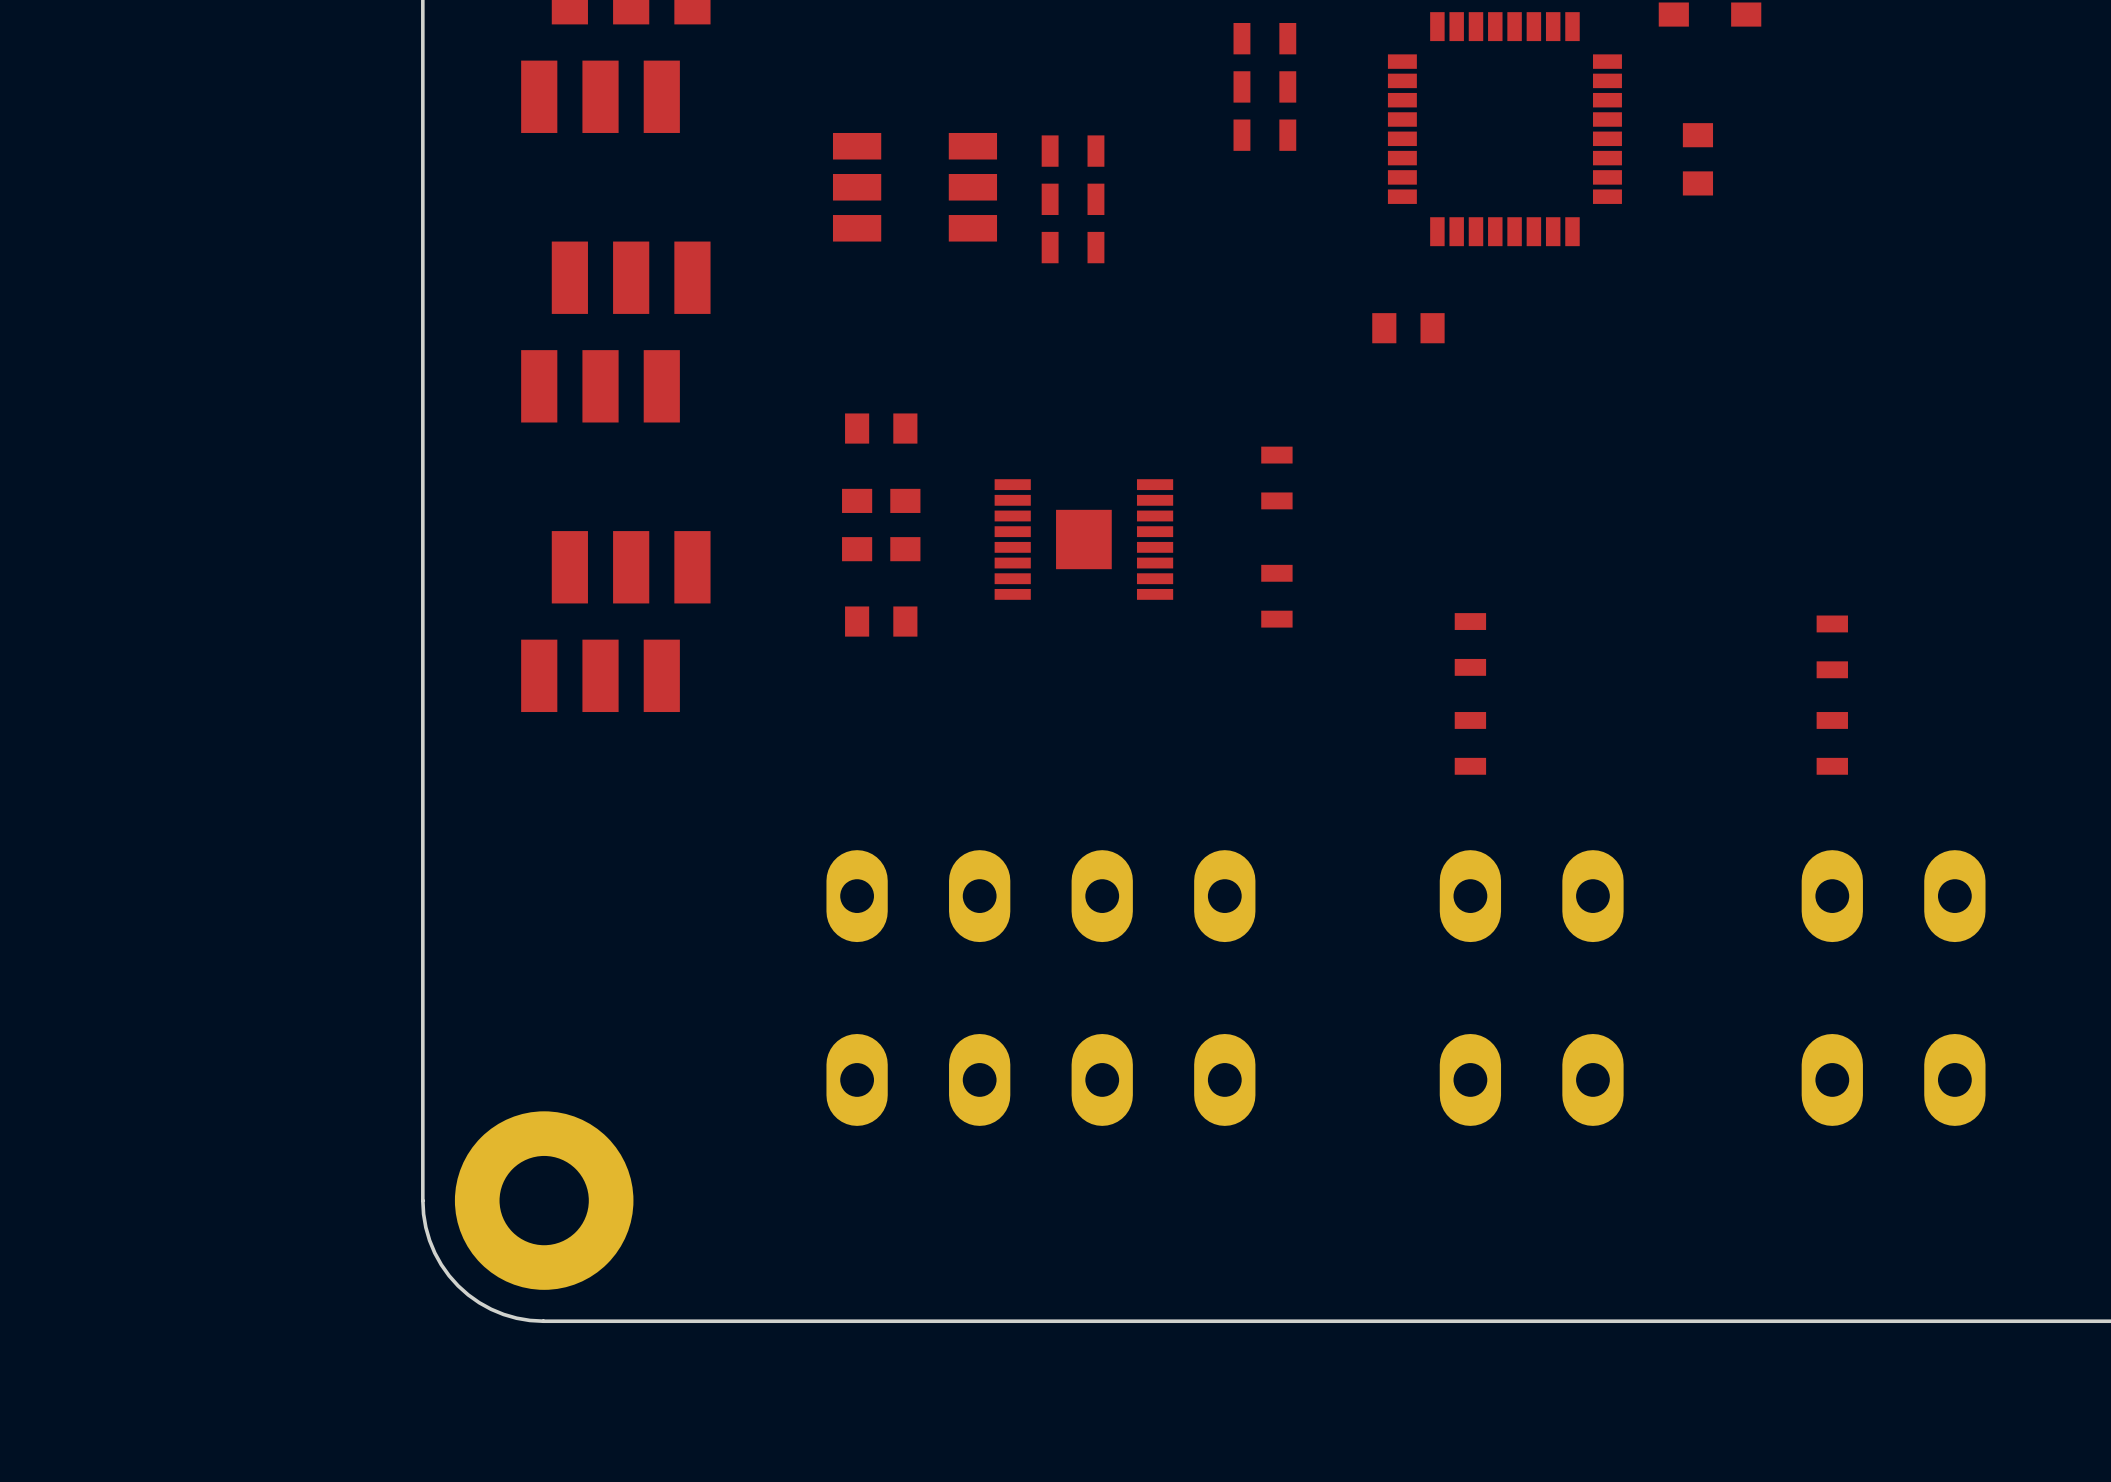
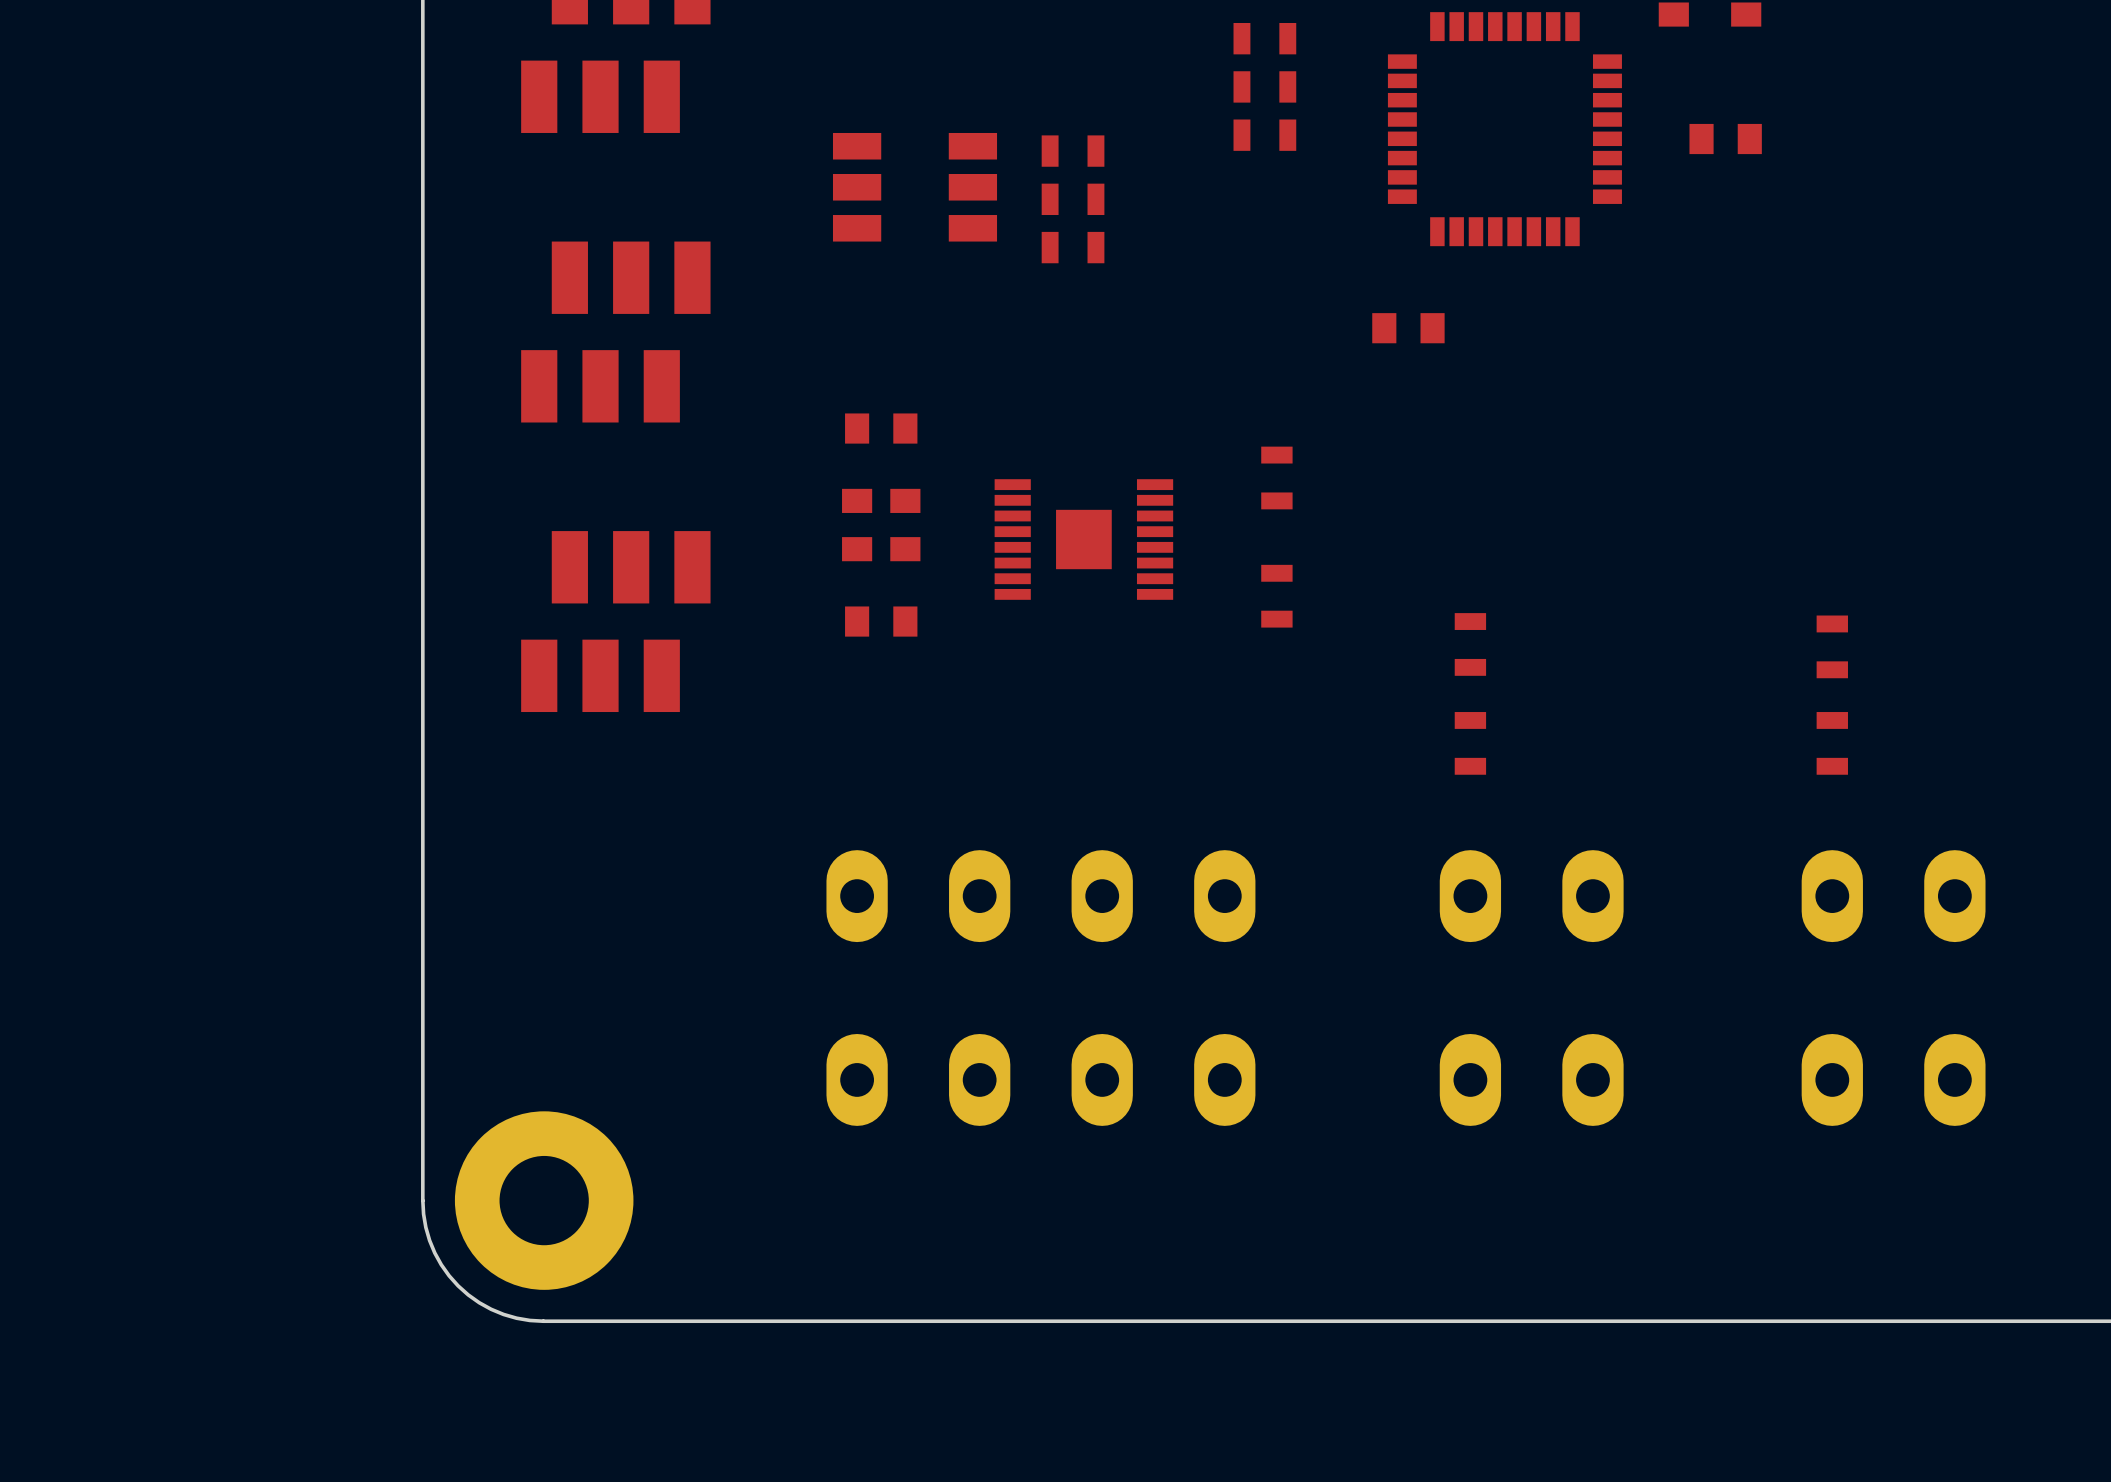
part rotation: 0° (1697, 159) -> 90° clockwise (1725, 139)

